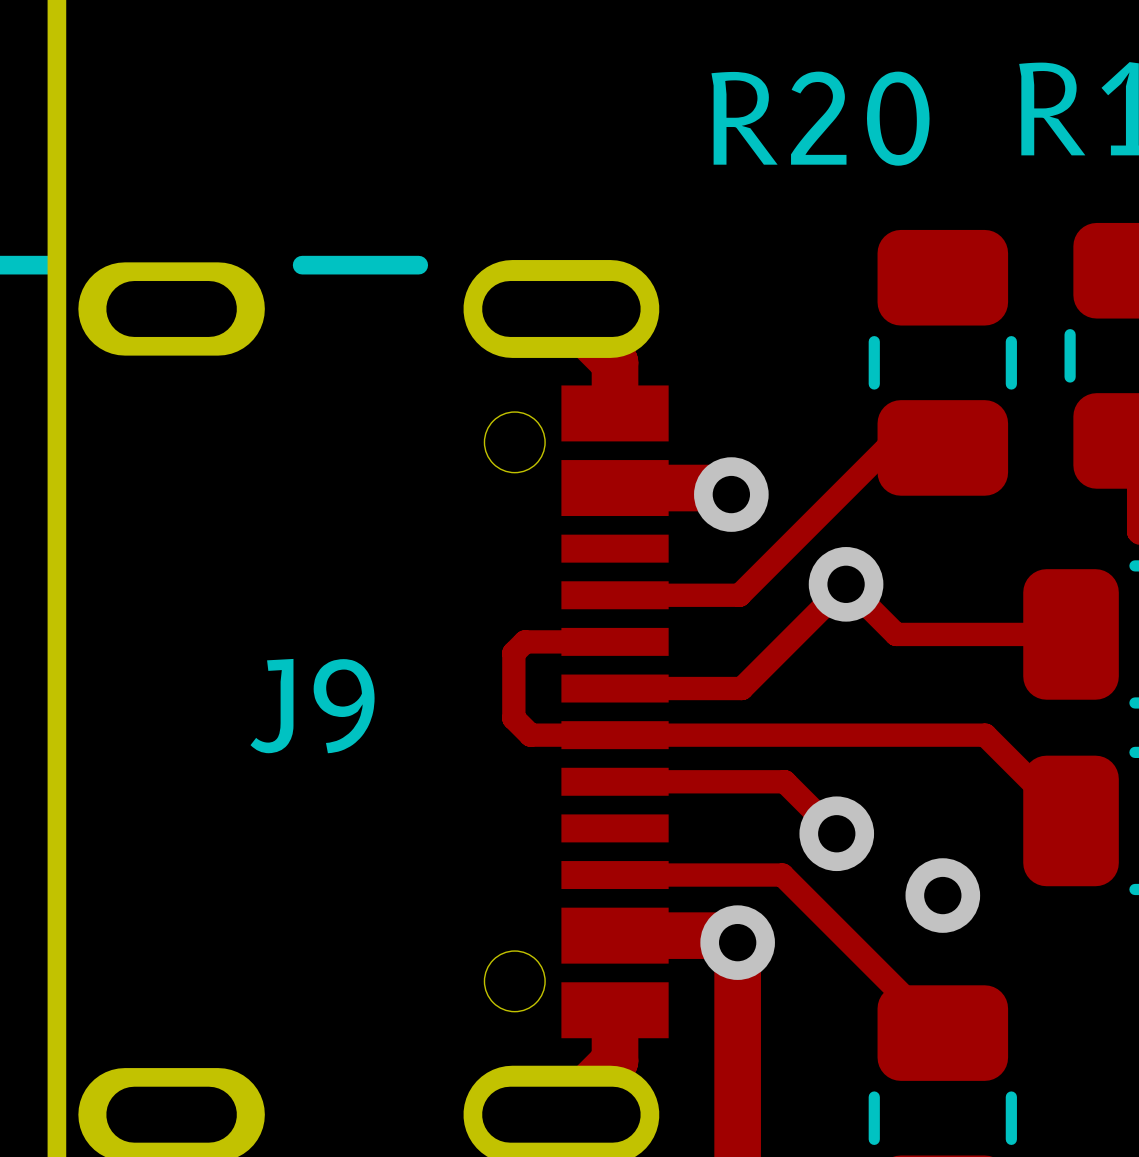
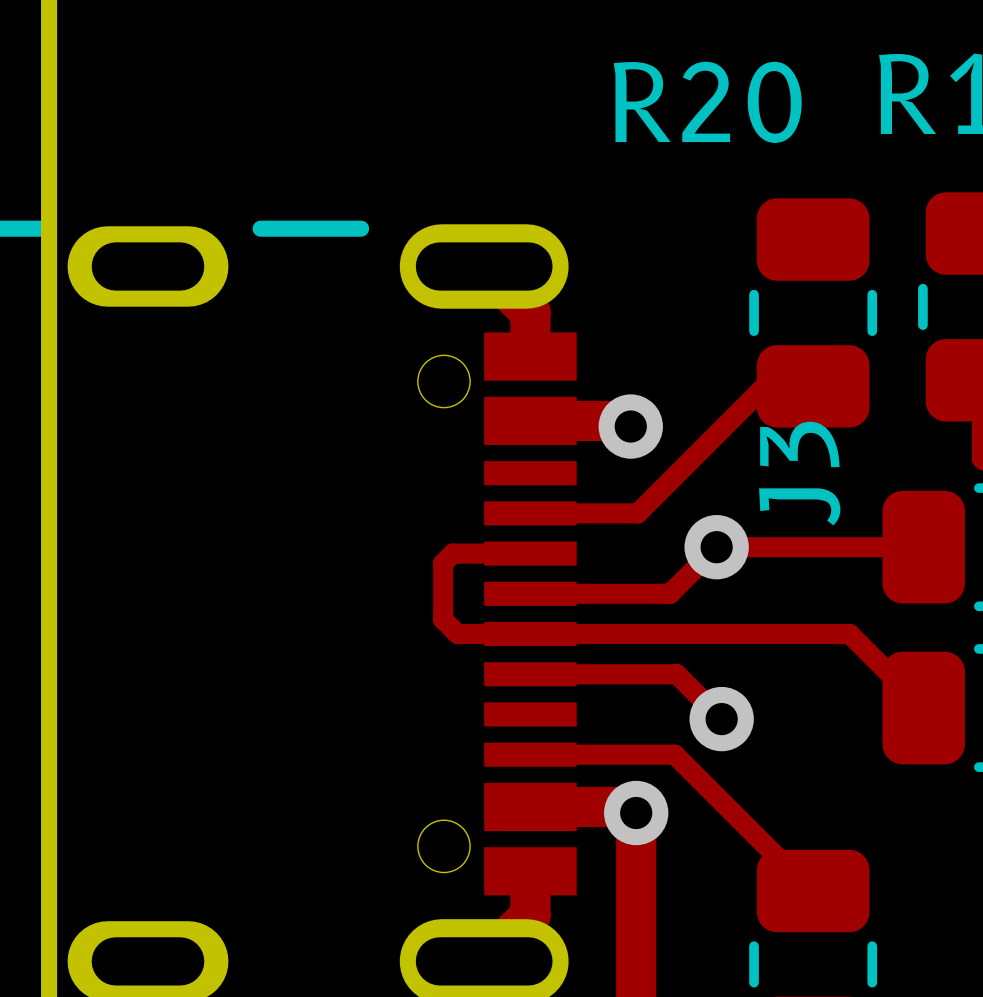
via position: (846, 584) -> (716, 547)
track: (896, 634) (846, 584) (741, 688) -> (772, 547) (716, 547) (669, 593) (639, 593)
J9 name: J9 (312, 706) -> J3 (799, 473)
via: (942, 895) -> none

